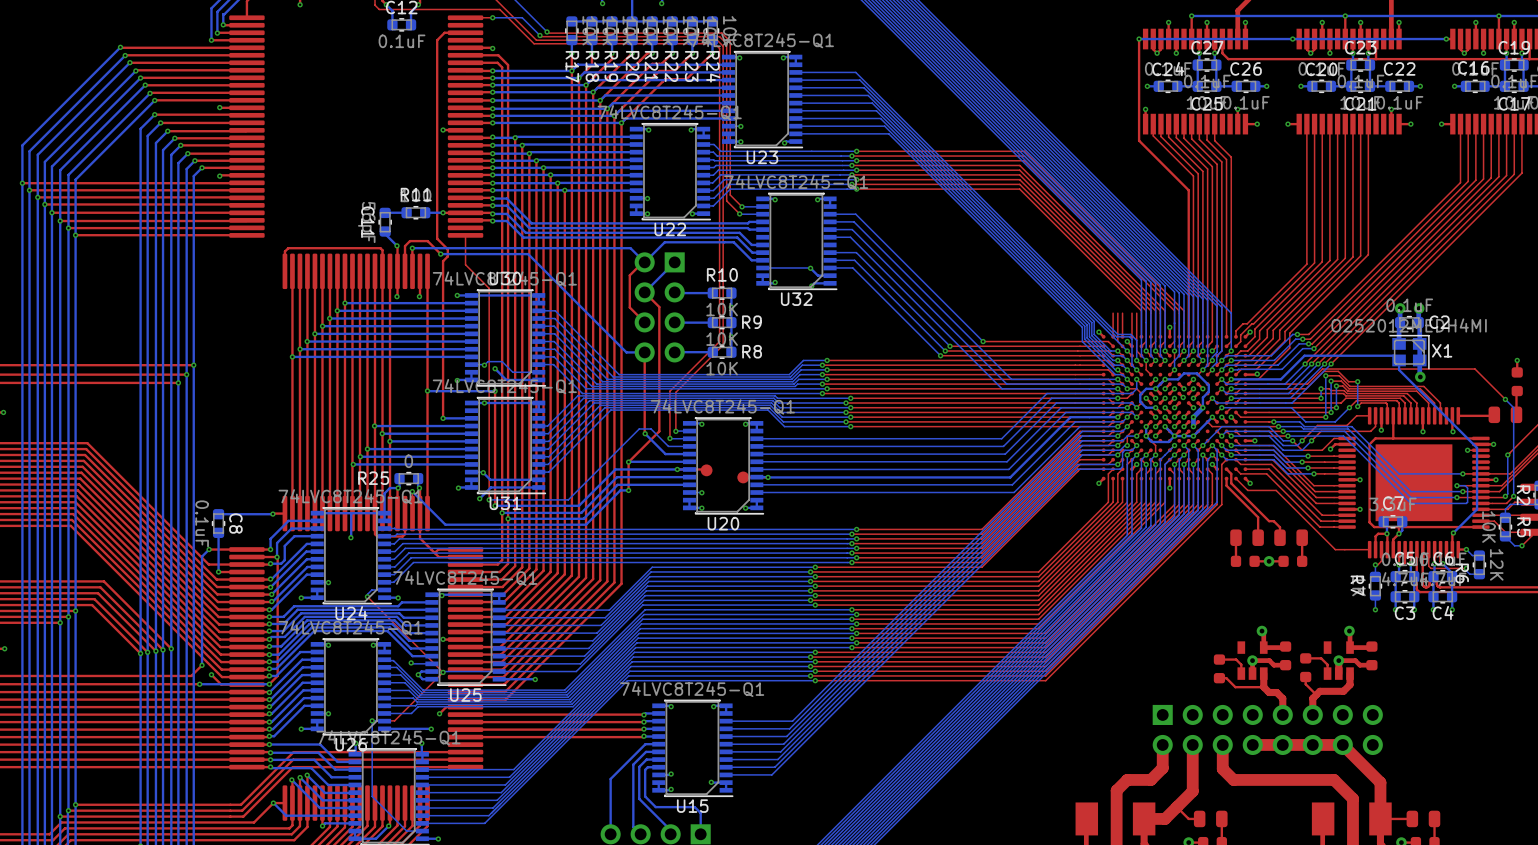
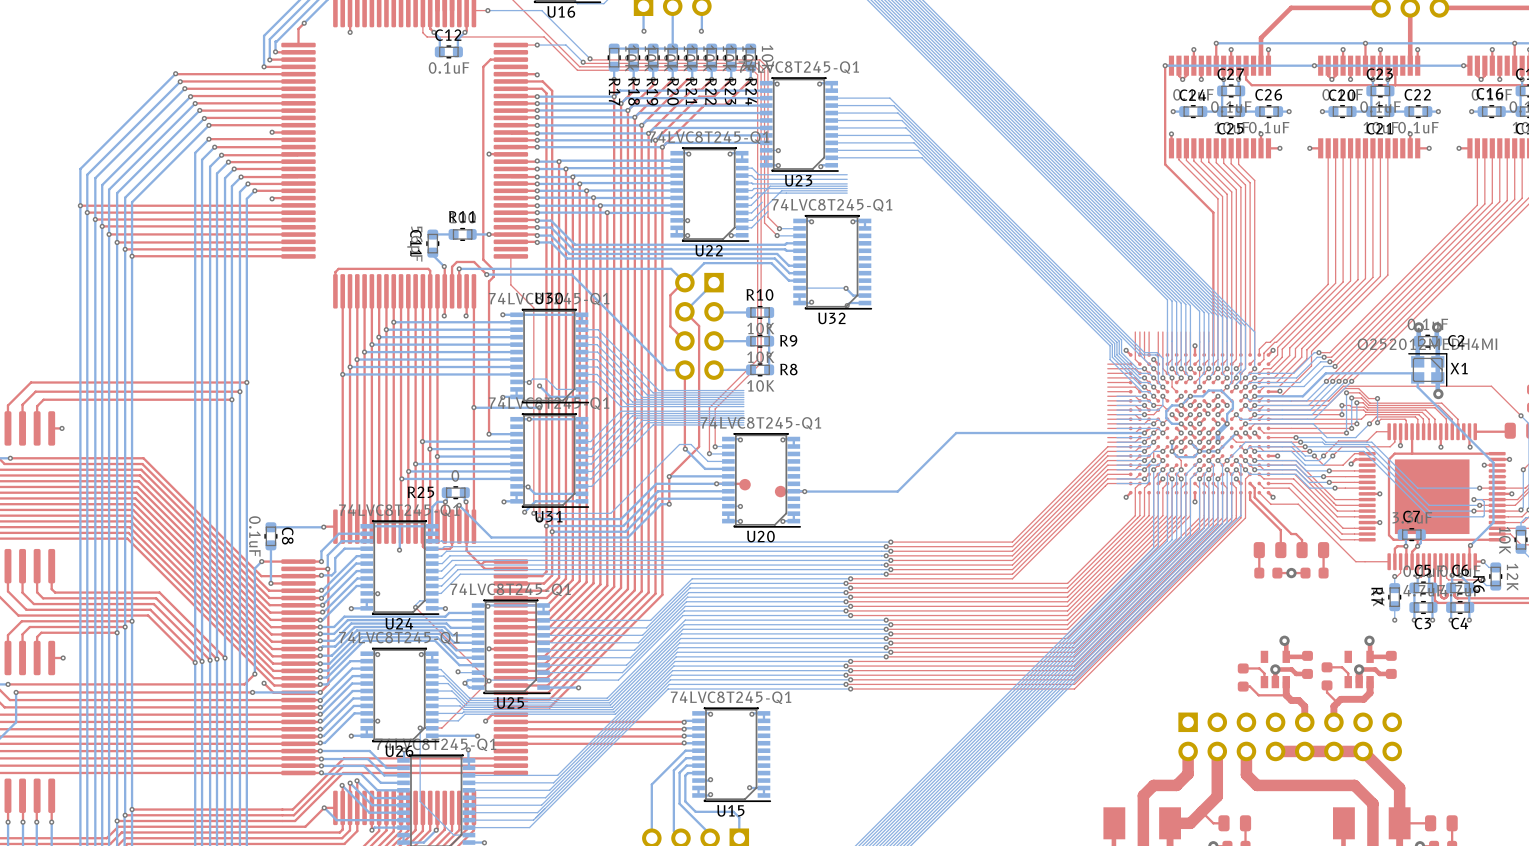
top track: (856, 151) (1024, 151) (1184, 310) (1184, 313) -> none
bottom track: (856, 151) (811, 151) -> none
via: (856, 151) -> none
top track: (851, 156) (1024, 156) (1179, 310) (1179, 313) -> none
bottom track: (851, 156) (811, 156) -> none
via: (851, 156) -> none
top track: (856, 160) (1024, 160) (1174, 310) (1174, 313) -> none
bottom track: (856, 160) (811, 160) -> none
via: (856, 160) -> none
top track: (851, 165) (1019, 165) (1165, 310) (1165, 313) -> none
bottom track: (851, 165) (811, 165) -> none
via: (851, 165) -> none
top track: (856, 170) (1019, 170) (1160, 310) (1160, 313) -> none
bottom track: (856, 170) (811, 170) -> none
via: (856, 170) -> none
top track: (851, 174) (1019, 174) (1155, 310) (1155, 313) -> none
bottom track: (851, 174) (720, 174) -> (847, 186) (770, 186) (758, 197)
via: (851, 174) -> none
top track: (856, 179) (1019, 179) (1150, 310) (1150, 313) -> none
bottom track: (856, 179) (724, 179) -> none
via: (856, 179) -> none
top track: (851, 184) (1019, 184) (1146, 310) (1146, 313) -> none
bottom track: (851, 184) (727, 184) -> (847, 190) (781, 190) (765, 206)
via: (851, 184) -> none
top track: (856, 189) (1019, 189) (1141, 310) (1141, 313) -> none
bottom track: (856, 189) (730, 189) -> none
via: (856, 189) -> none
bottom track: (830, 214) (855, 214) (983, 341) -> none
bottom track: (830, 221) (854, 221) (1011, 379) (1089, 379) -> none
bottom track: (830, 229) (852, 229) (1006, 384) (1089, 384) -> none
bottom track: (830, 237) (850, 237) (1002, 388) (1089, 388) -> none
bottom track: (830, 252) (856, 252) (950, 346) -> none
bottom track: (830, 260) (854, 260) (945, 351) -> none
bottom track: (830, 267) (852, 267) (940, 355) -> none
via: (983, 341) -> none
top track: (1108, 341) (983, 341) -> (1135, 359) (1135, 332)
via: (950, 346) -> none
top track: (1080, 346) (950, 346) -> none
via: (945, 351) -> none
top track: (1080, 351) (945, 351) -> none
via: (940, 355) -> none
top track: (1080, 355) (940, 355) -> none
bottom track: (827, 360) (803, 360) (789, 374) (617, 373) -> (743, 390) (658, 390)
via: (827, 360) -> none
top track: (1080, 360) (827, 360) -> none
bottom track: (822, 365) (802, 365) (790, 377) (612, 375) -> (743, 392) (653, 392)
via: (822, 365) -> none
top track: (1080, 365) (822, 365) -> none
bottom track: (827, 369) (801, 369) (791, 379) (606, 378) -> (743, 395) (647, 395)
via: (827, 369) -> none
top track: (1080, 369) (827, 369) -> none
bottom track: (822, 374) (799, 374) (792, 381) (601, 380) -> (743, 397) (642, 397)
via: (822, 374) -> none
top track: (1080, 374) (822, 374) -> none
bottom track: (827, 379) (798, 379) (794, 384) (595, 382) -> (743, 399) (637, 399)
via: (827, 379) -> none
top track: (1080, 379) (827, 379) -> none
bottom track: (822, 384) (797, 384) (795, 386) (590, 385) -> (743, 402) (632, 402)
via: (822, 384) -> none
top track: (1080, 384) (822, 384) -> none
bottom track: (584, 387) (827, 388) -> (626, 404) (743, 404)
via: (827, 388) -> none
top track: (1080, 388) (827, 388) -> none
bottom track: (578, 389) (582, 393) (822, 393) -> (621, 406) (743, 406)
via: (822, 393) -> none
top track: (1080, 393) (822, 393) -> none
bottom track: (1089, 393) (1046, 393) (1001, 438) (756, 438) -> none
bottom track: (577, 395) (775, 395) (777, 398) (850, 398) -> (619, 412) (743, 411)
bottom track: (583, 398) (773, 398) (778, 402) (846, 402) -> (625, 414) (743, 413)
via: (850, 398) -> none
top track: (1080, 398) (850, 398) -> none
bottom track: (1089, 398) (1051, 398) (1003, 446) (756, 446) -> none
bottom track: (589, 400) (772, 400) (779, 407) (850, 407) -> (631, 416) (743, 415)
bottom track: (594, 402) (771, 402) (781, 412) (846, 412) -> (635, 419) (743, 418)
via: (846, 402) -> none
top track: (1080, 402) (846, 402) -> none
bottom track: (1089, 402) (1056, 402) (1005, 454) (756, 454) -> none
bottom track: (600, 405) (770, 405) (782, 417) (850, 417) -> (641, 421) (743, 420)
bottom track: (604, 407) (769, 407) (783, 421) (846, 421) -> (646, 423) (743, 422)
via: (850, 407) -> none
top track: (1080, 407) (850, 407) -> none
bottom track: (1089, 407) (1061, 407) (1007, 461) (756, 461) -> none
bottom track: (610, 410) (768, 410) (784, 426) (850, 426) -> (652, 426) (743, 424)
via: (846, 412) -> none
top track: (1080, 412) (846, 412) -> none
bottom track: (1089, 412) (1065, 412) (1008, 469) (756, 469) -> none
via: (850, 417) -> none
bottom track: (1070, 417) (1010, 477) (863, 477) -> (1098, 433) (956, 433) (897, 491)
top track: (1080, 417) (850, 417) -> none
via: (846, 421) -> none
top track: (1080, 421) (846, 421) -> none
bottom track: (1089, 421) (1075, 421) (1012, 484) (756, 484) -> none
via: (850, 426) -> none
top track: (1080, 426) (850, 426) -> none
bottom track: (1089, 426) (1080, 426) (1014, 492) (756, 492) -> none
bottom track: (1089, 431) (1082, 431) (792, 721) (726, 721) -> none
bottom track: (1089, 436) (1082, 436) (789, 728) (726, 728) -> none
bottom track: (1089, 440) (1082, 440) (786, 736) (726, 736) -> none
bottom track: (1089, 445) (1082, 445) (783, 744) (726, 744) -> none
bottom track: (1089, 450) (1082, 450) (780, 751) (726, 751) -> none
bottom track: (1089, 454) (1082, 454) (777, 759) (726, 759) -> none
bottom track: (1089, 464) (1077, 464) (774, 767) (726, 767) -> none
bottom track: (1089, 469) (1077, 469) (771, 774) (726, 774) -> none

